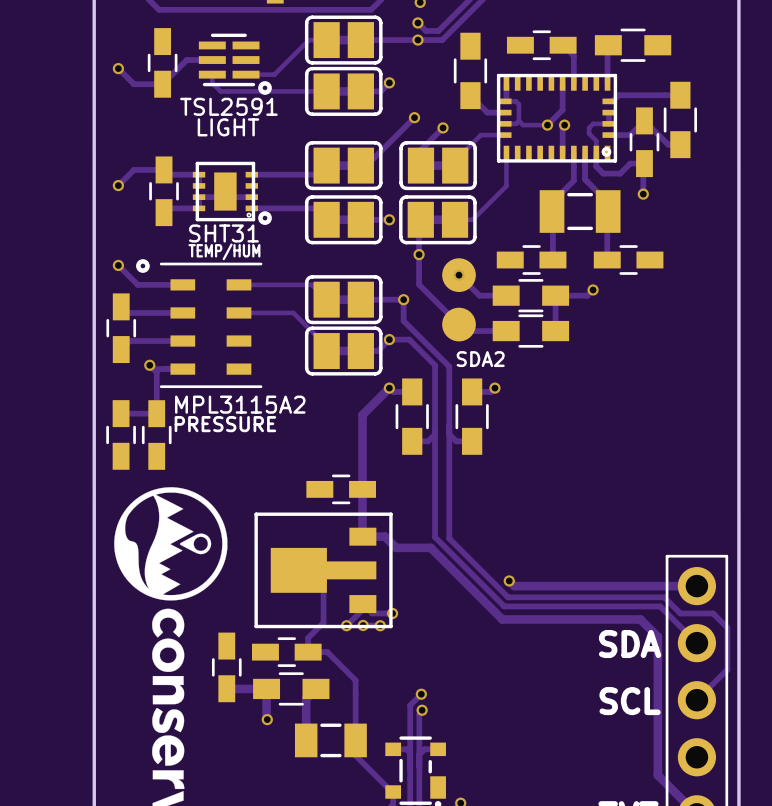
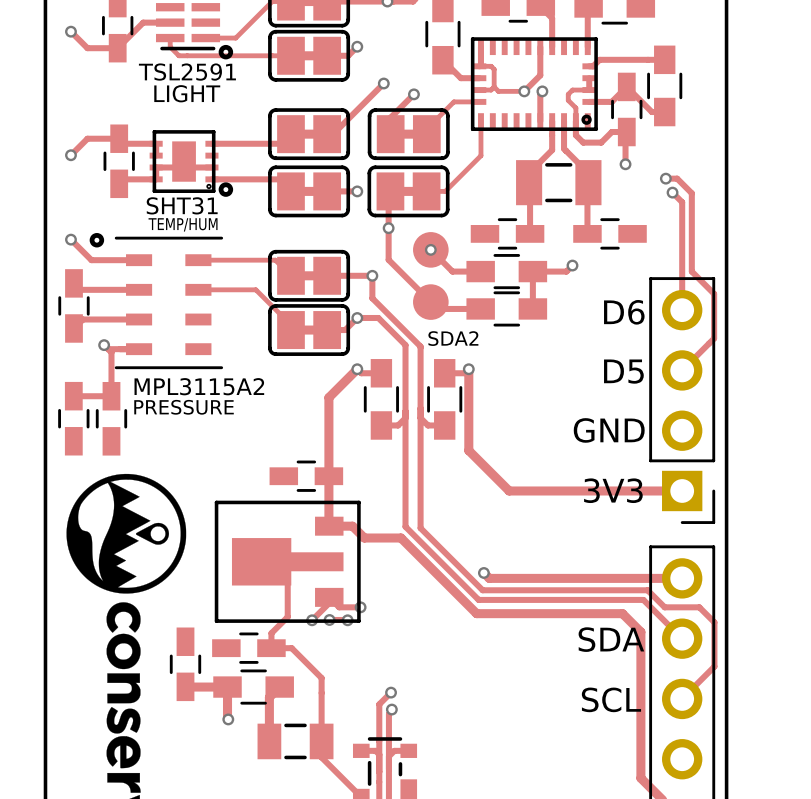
track: none -> (665, 178) (677, 178) (691, 193) (691, 271) (714, 293) (714, 338) (682, 370)
via: none -> (665, 178)
track: none -> (672, 192) (682, 202) (682, 310)
via: none -> (672, 192)
text: none -> D6 (624, 312)
track: none -> (468, 369) (468, 450) (509, 490) (682, 490)
text: none -> D5 (623, 371)
part: none -> (682, 400)
text: none -> GND (609, 430)
text: none -> 3V3 (613, 490)

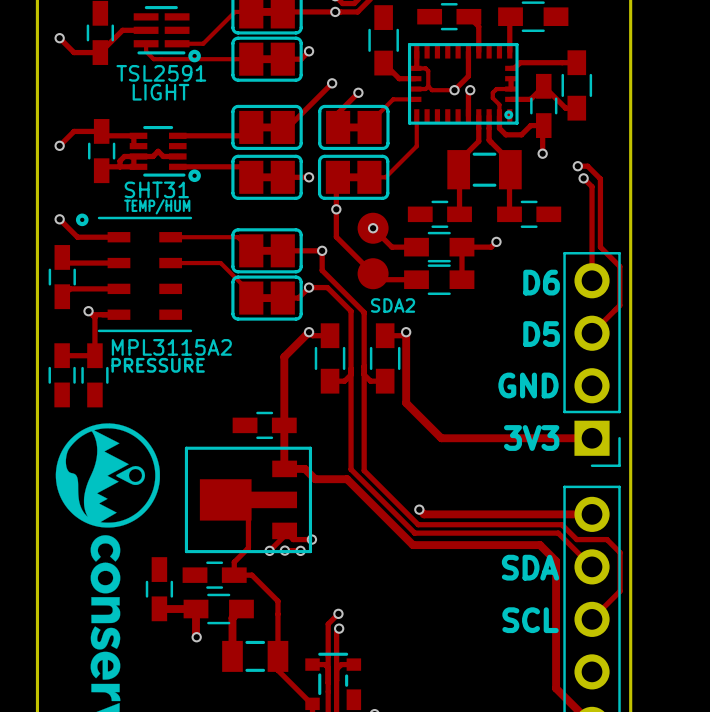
part footprint: [149, 130, 219, 194] -> [129, 125, 187, 177]
track: none -> (133, 156) (124, 156) (120, 160) (120, 166)

